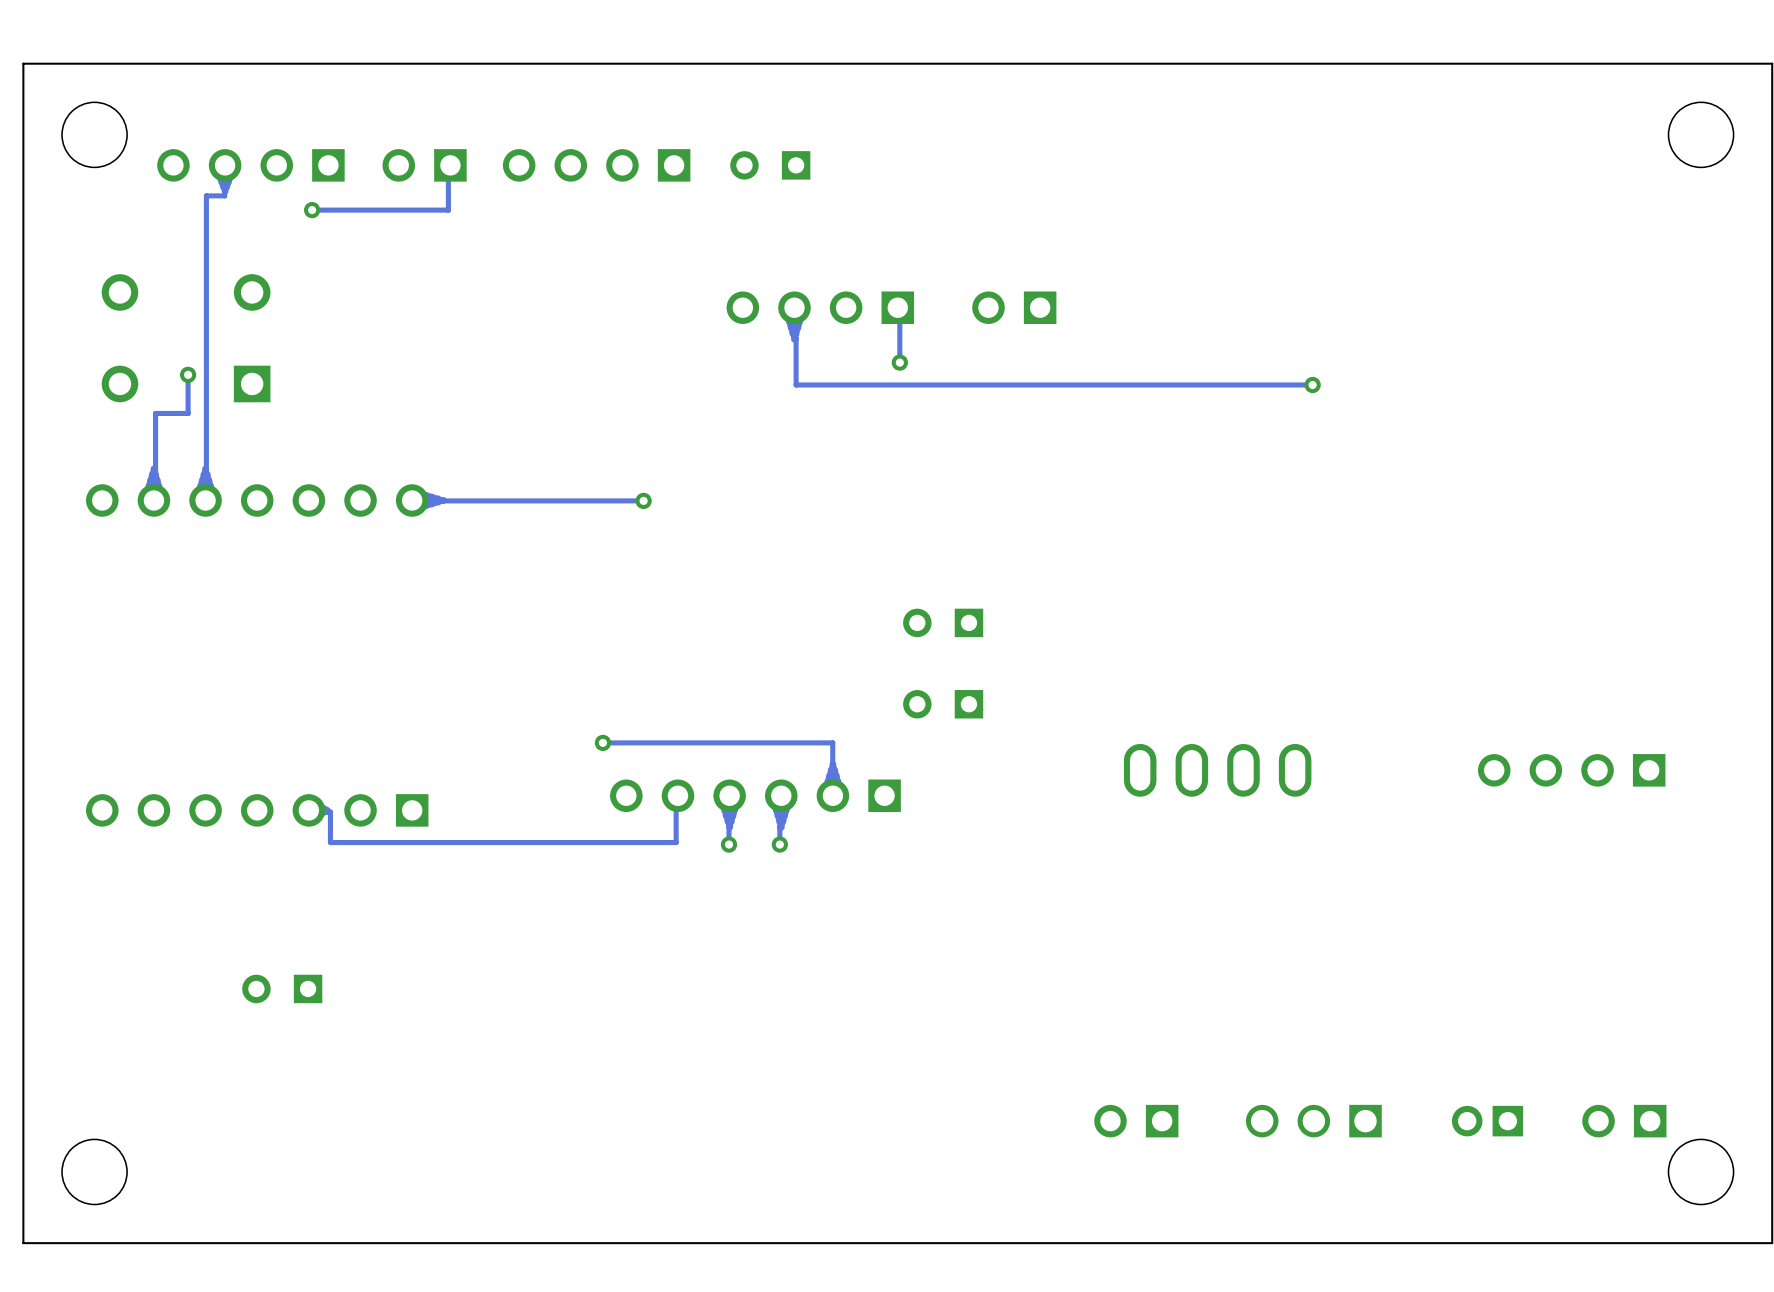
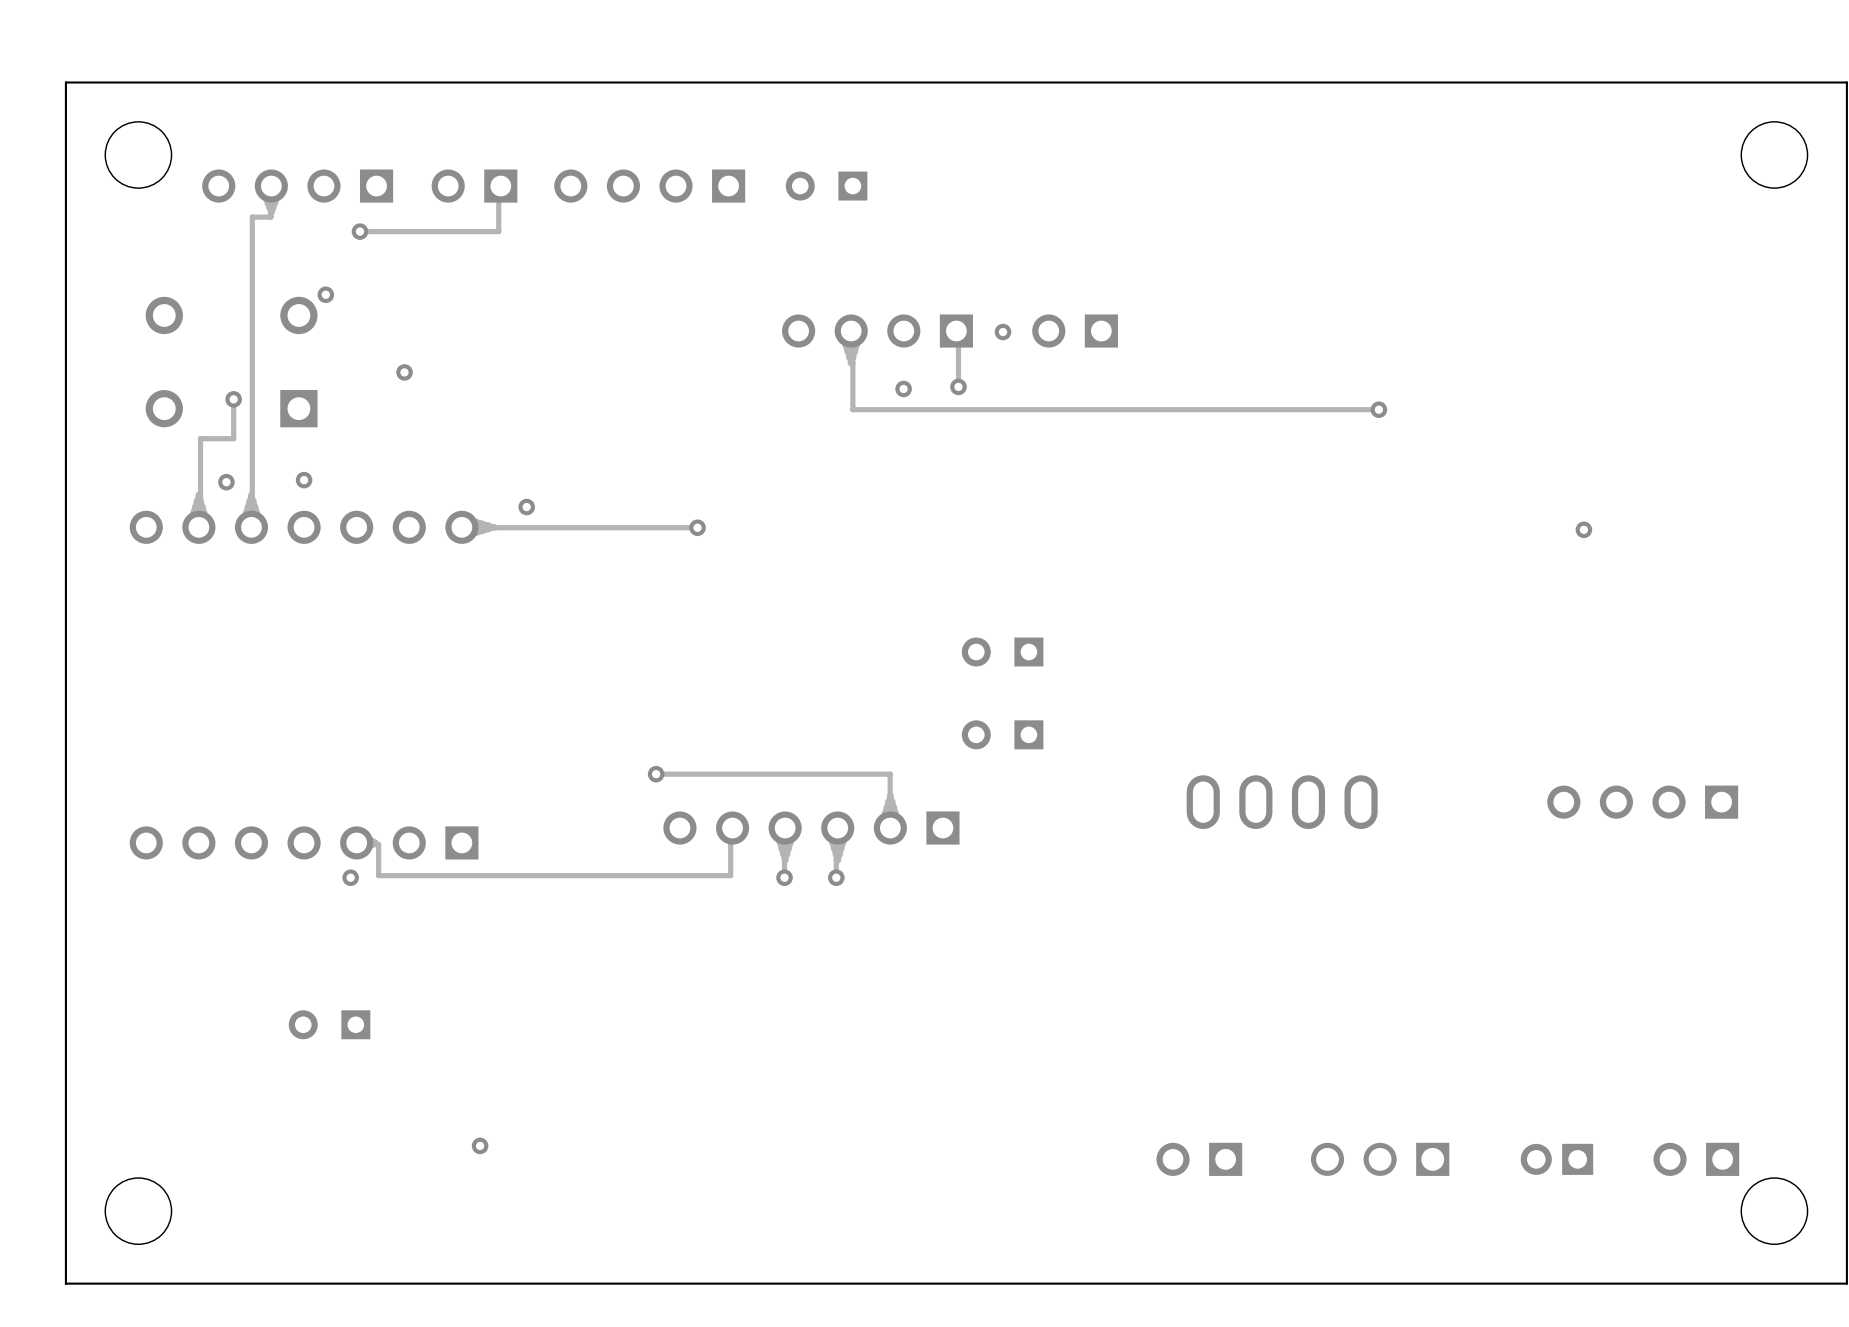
via: none -> (325, 294)
via: none -> (1003, 332)
via: none -> (404, 372)
via: none -> (903, 388)
via: none -> (304, 480)
via: none -> (226, 482)
via: none -> (526, 507)
via: none -> (1583, 529)
via: none -> (350, 877)
via: none -> (480, 1145)

